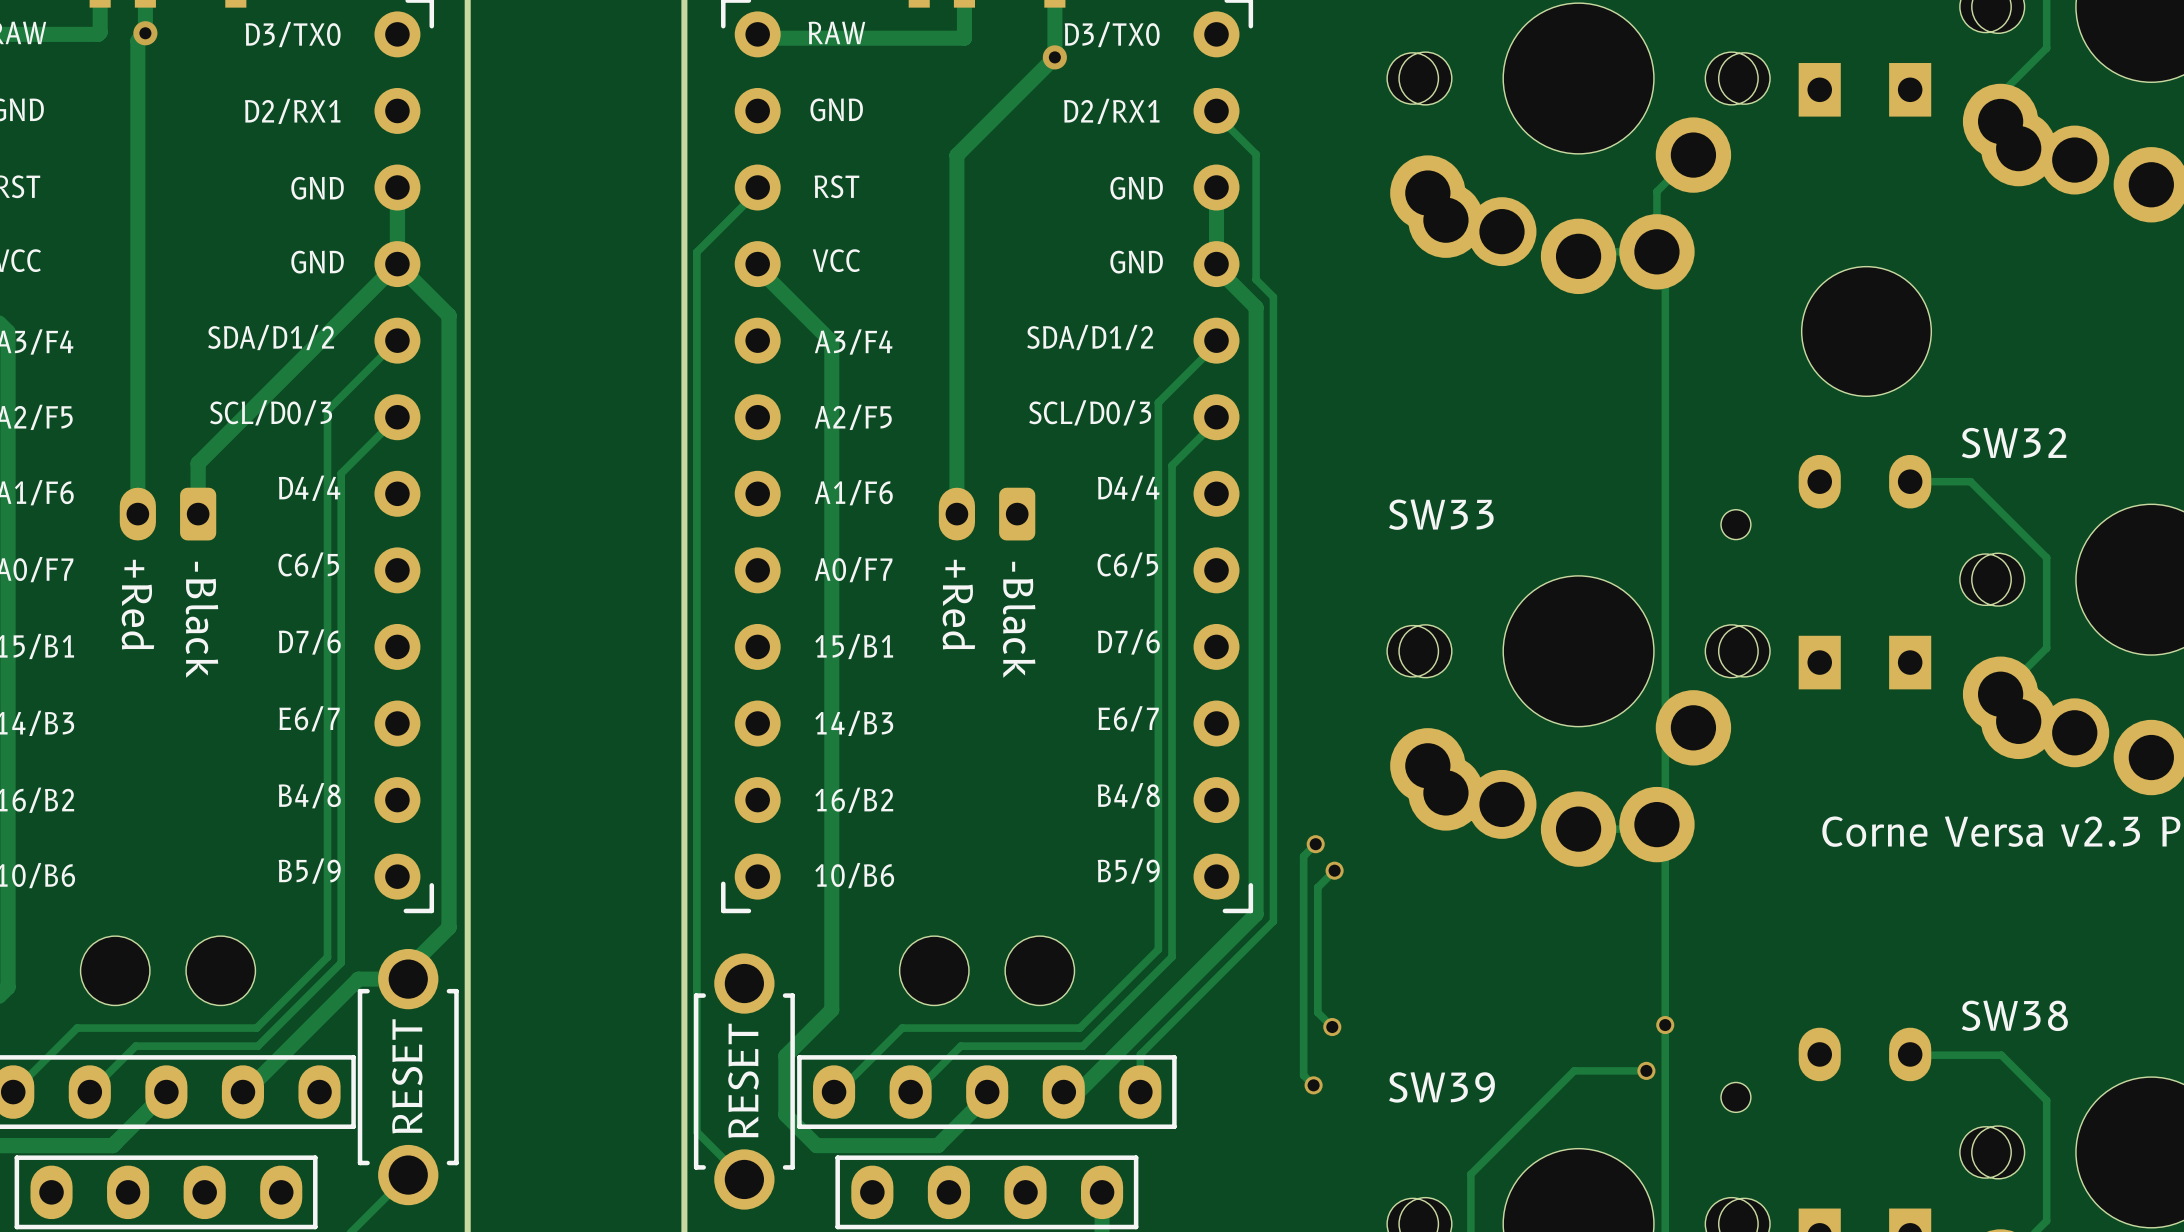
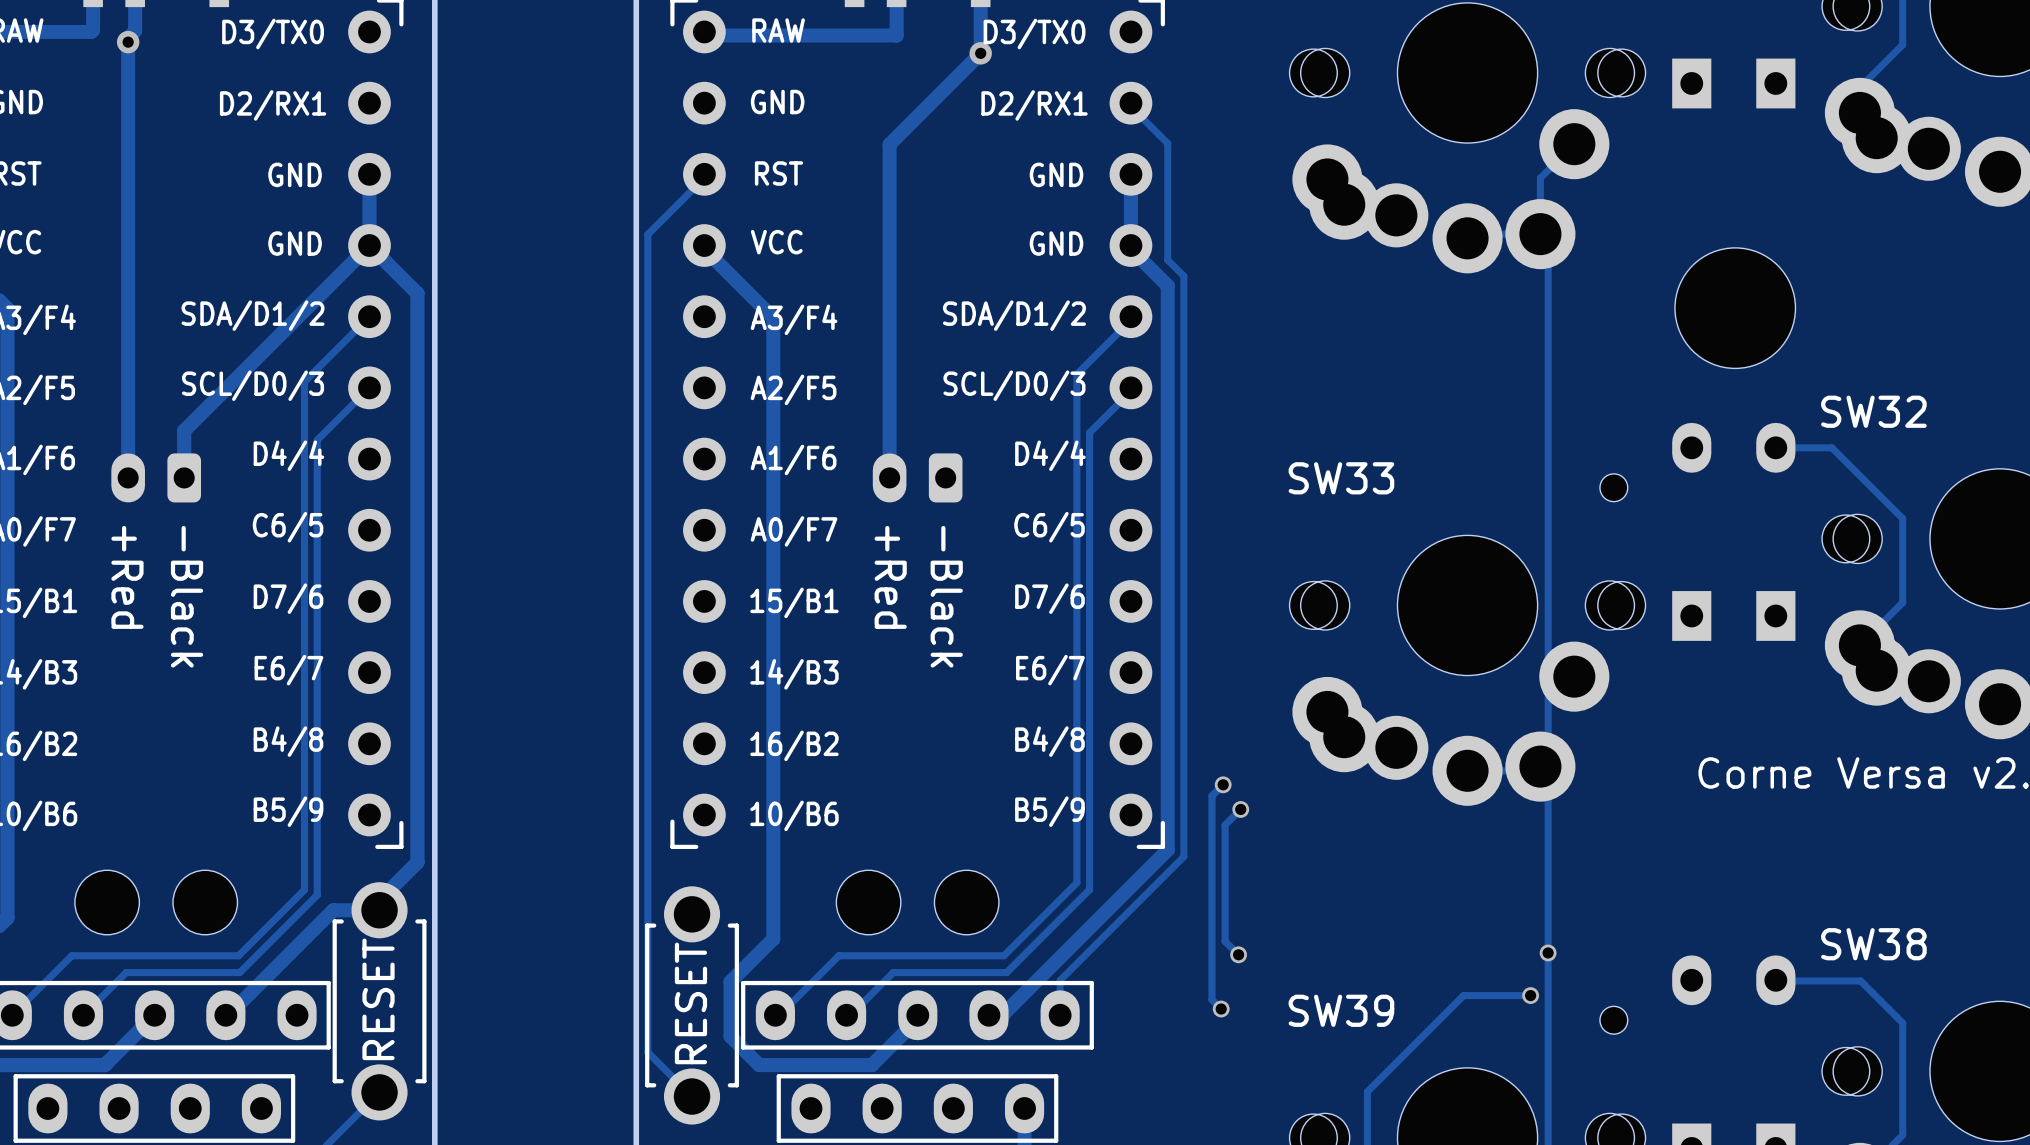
via position: (145, 33) -> (128, 42)

